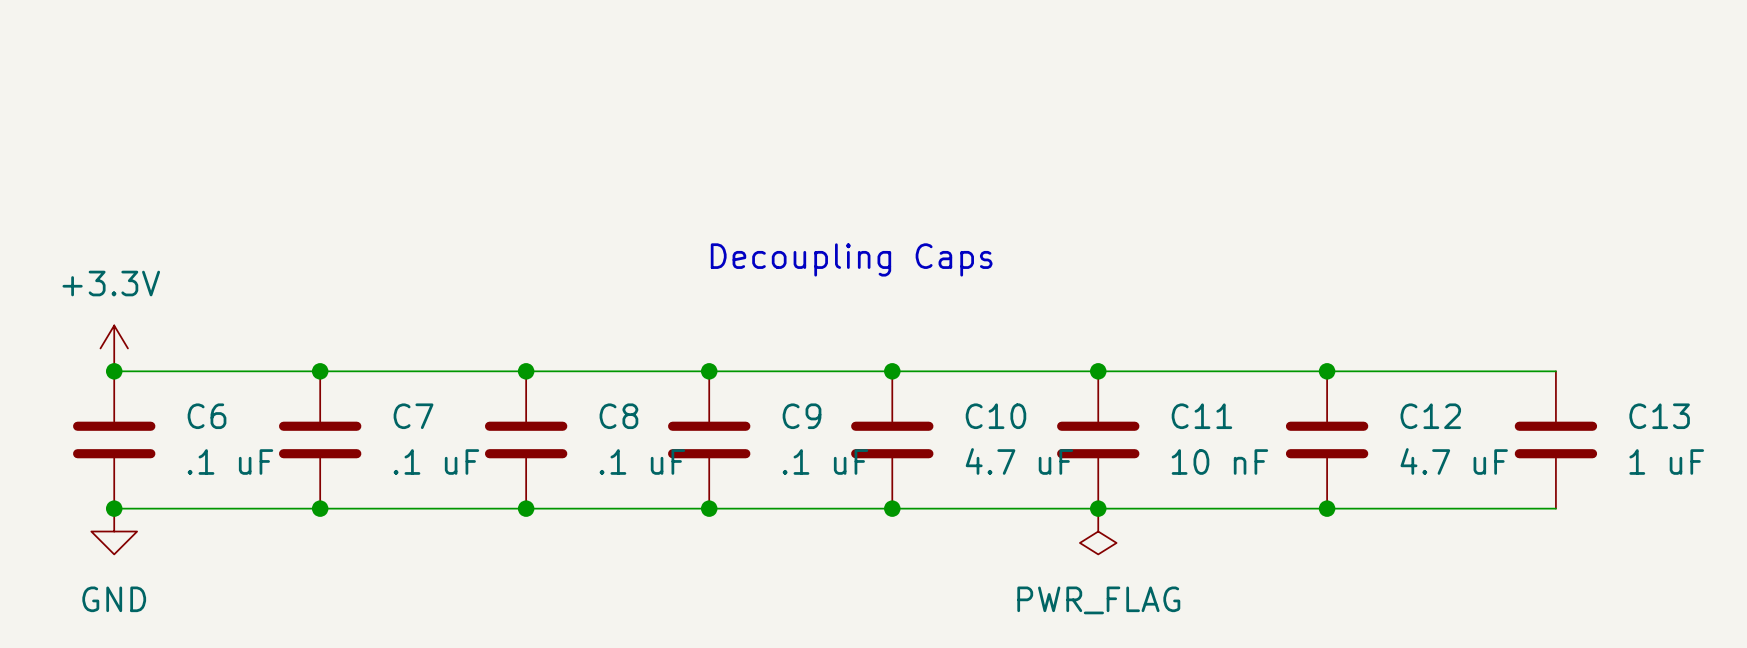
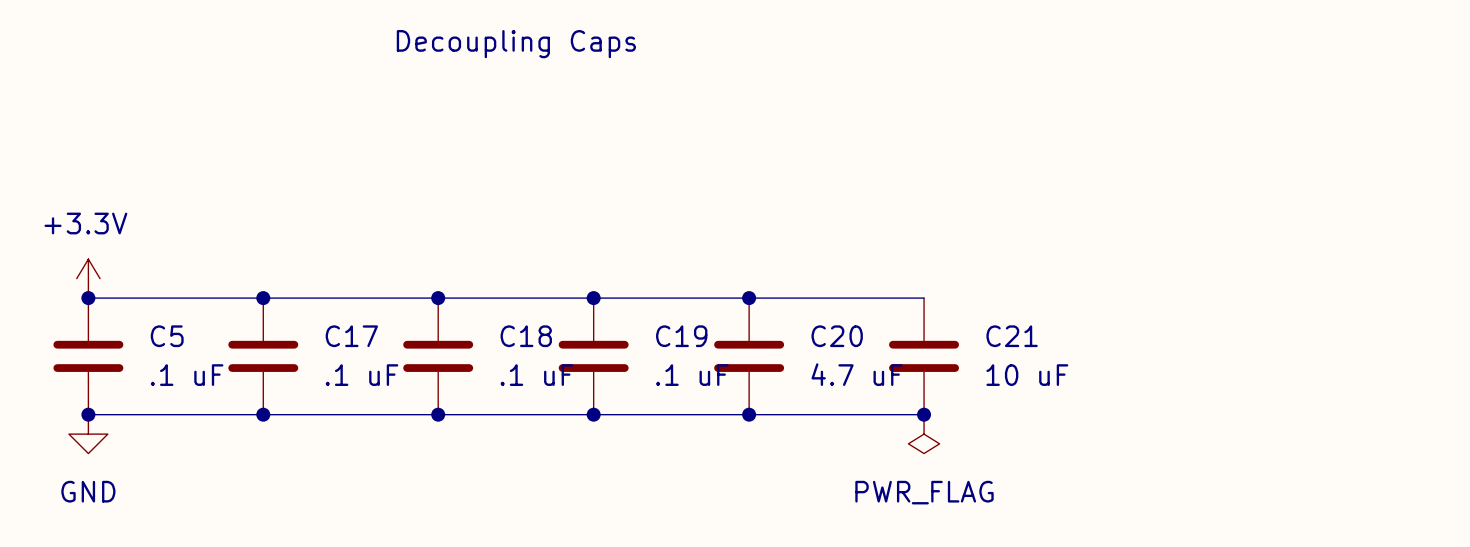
text position: Decoupling Caps (851, 259) -> Decoupling Caps (516, 44)
wire: (1098, 371) (1555, 371) -> none
junction: (1098, 371) -> none
junction: (1327, 371) -> none
C6 name: C6 (207, 416) -> C5 (167, 336)
C7 name: C7 (413, 416) -> C17 (351, 336)
C8 name: C8 (618, 416) -> C18 (526, 336)
C9 name: C9 (802, 416) -> C19 (681, 336)
C10 name: C10 (995, 416) -> C20 (837, 336)
C11 name: C11 (1201, 416) -> C21 (1012, 336)
C12: 4.7 uF (1327, 439) -> none
C13: 1 uF (1555, 439) -> none
C11 value: 10 nF (1219, 462) -> 10 uF (1027, 375)
wire: (1098, 508) (1555, 508) -> none
junction: (1327, 508) -> none

